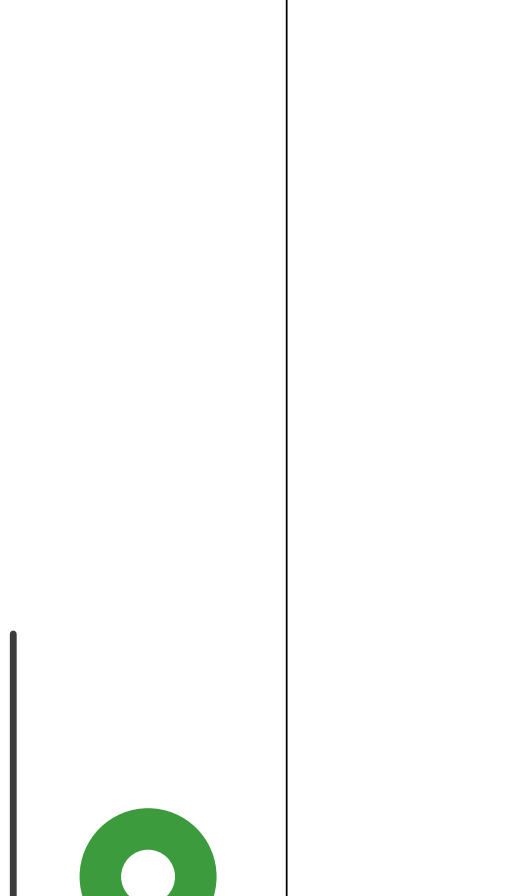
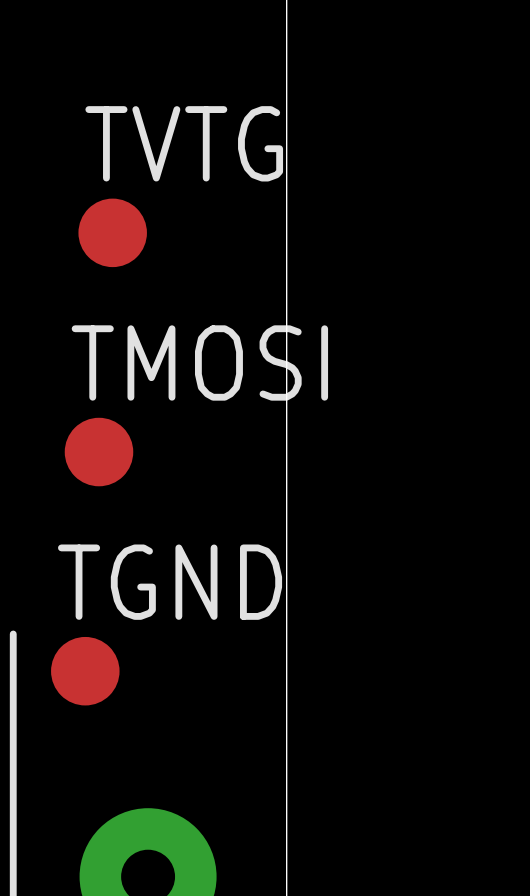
TVTG: none -> (112, 232)
TMOSI: none -> (99, 452)
TGND: none -> (85, 671)

